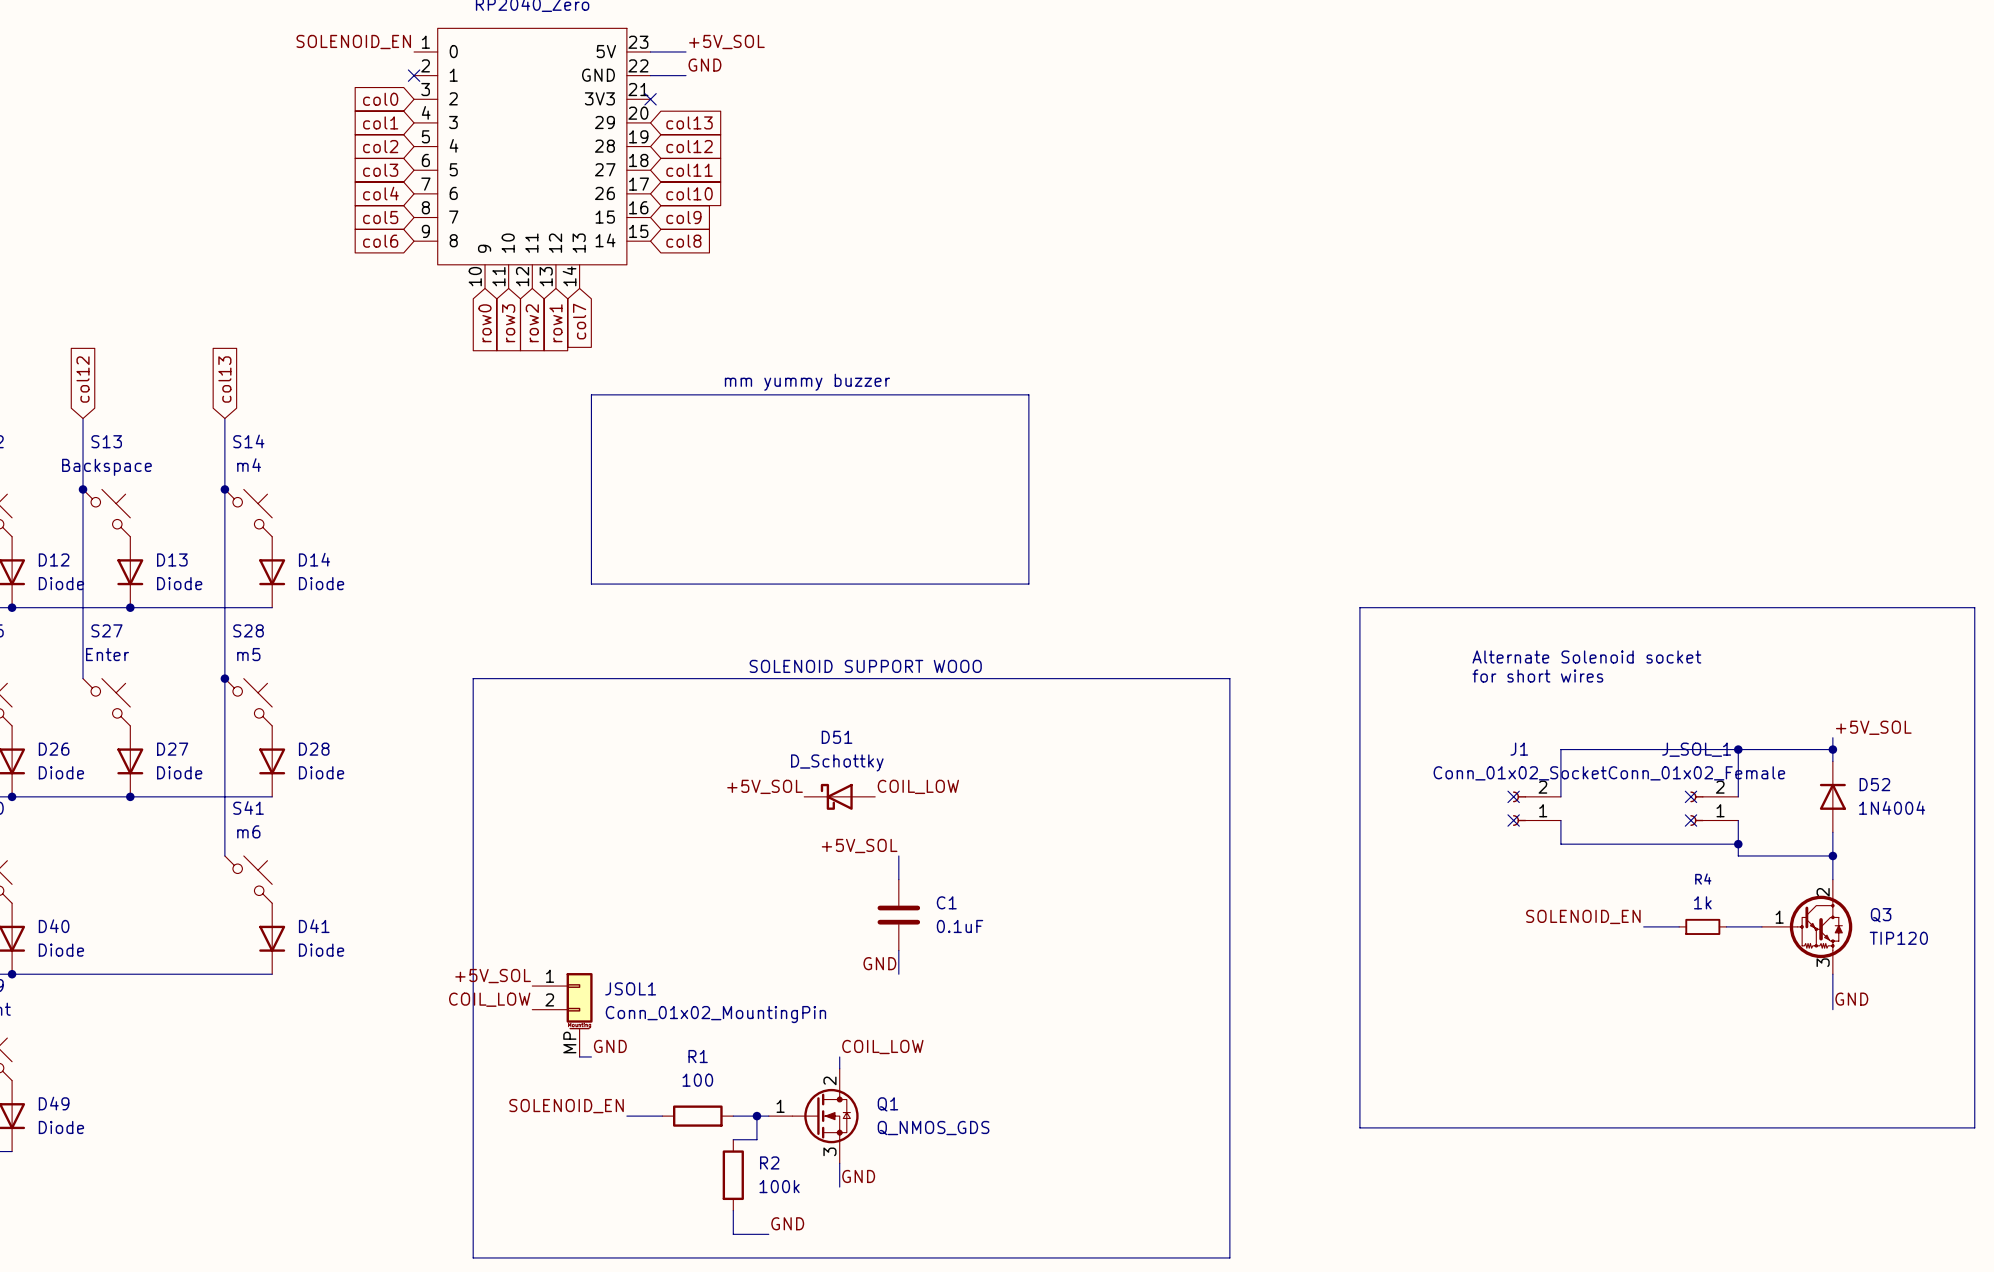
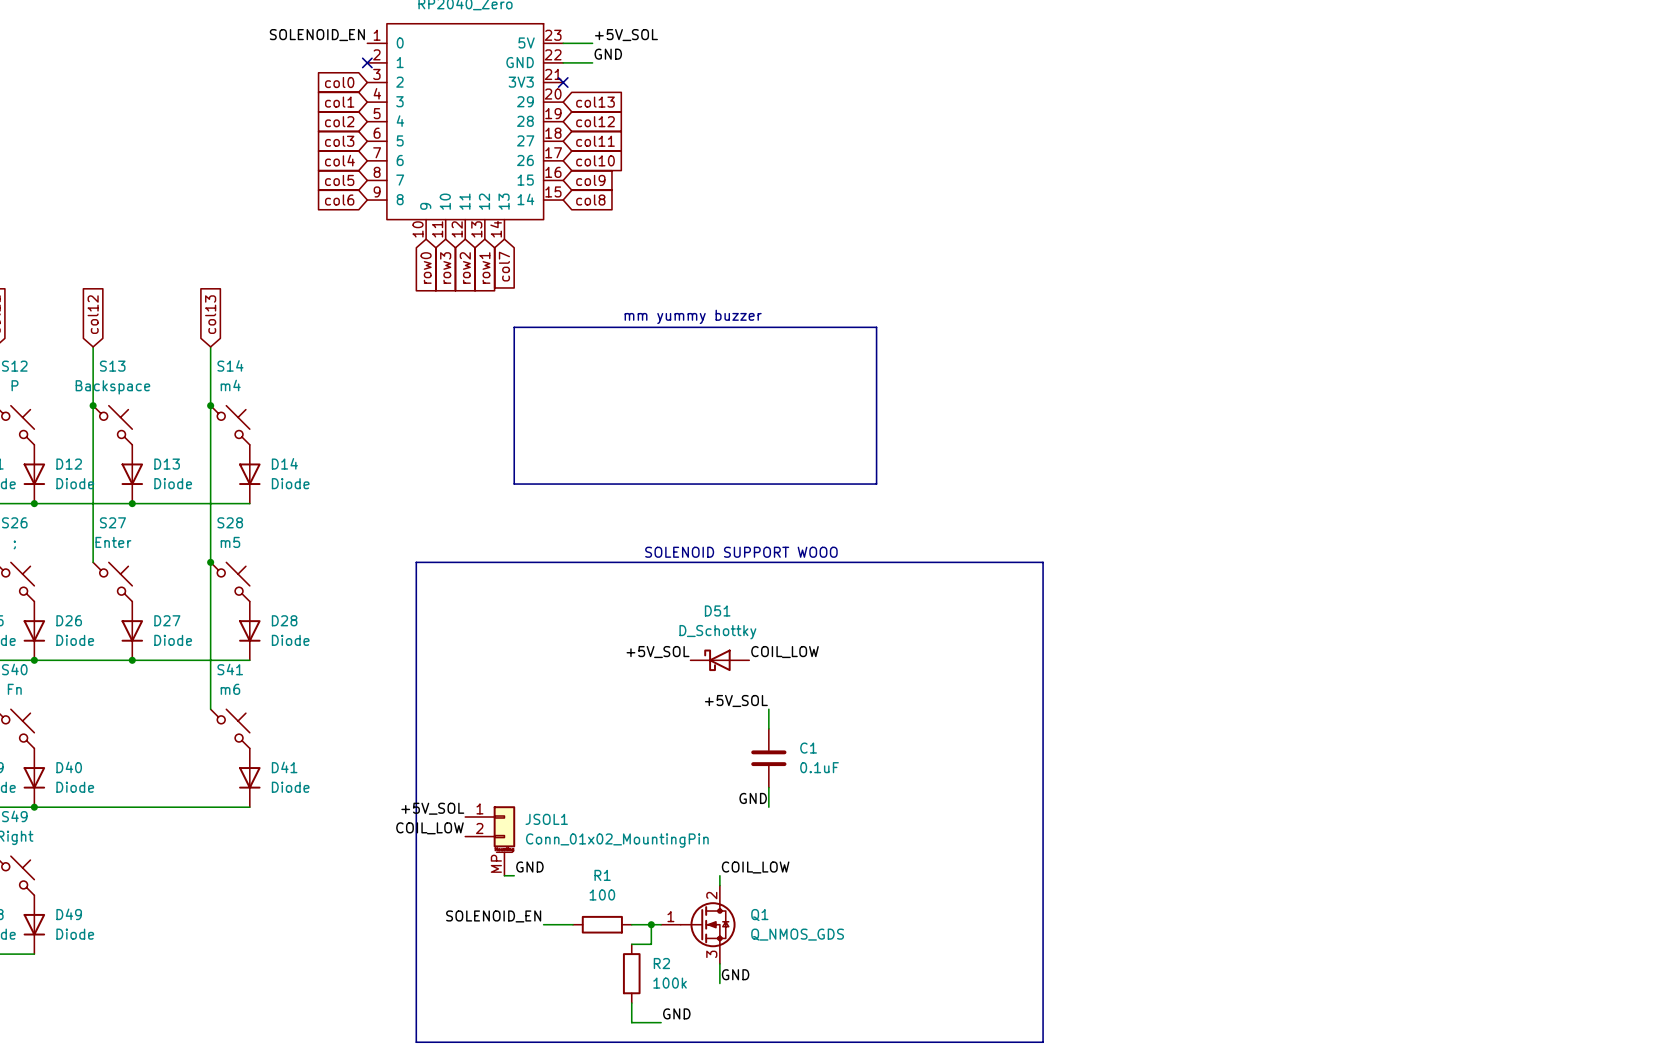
line: (1359, 607) (1974, 607) (1974, 1127) (1359, 1127) (1359, 607) -> none
text: Alternate Solenoid socket (1586, 657) -> none
text: for short wires (1537, 676) -> none
label: +5V_SOL (1873, 727) -> none
wire: (1832, 737) (1832, 761) -> none
wire: (1738, 749) (1738, 796) -> none
junction: (1738, 749) -> none
wire: (1832, 749) (1560, 749) (1560, 796) -> none
junction: (1832, 749) -> none
no-connect mark: (1513, 796) -> none
no-connect mark: (1690, 796) -> none
D52: 1N4004 (1832, 796) -> none
J1: Conn_01x02_Socket (1536, 808) -> none
J_SOL_1: Conn_01x02_Female (1714, 808) -> none
no-connect mark: (1513, 820) -> none
wire: (1560, 820) (1560, 844) (1738, 844) -> none
no-connect mark: (1690, 820) -> none
wire: (1738, 820) (1738, 855) (1832, 855) -> none
wire: (1832, 832) (1832, 879) -> none
junction: (1738, 844) -> none
junction: (1832, 855) -> none
label: SOLENOID_EN (1583, 916) -> none
wire: (1643, 926) (1679, 926) -> none
R4: 1k (1702, 926) -> none
wire: (1726, 926) (1761, 926) -> none
Q3: TIP120 (1807, 926) -> none
wire: (1832, 974) (1832, 1009) -> none
label: GND (1851, 999) -> none

